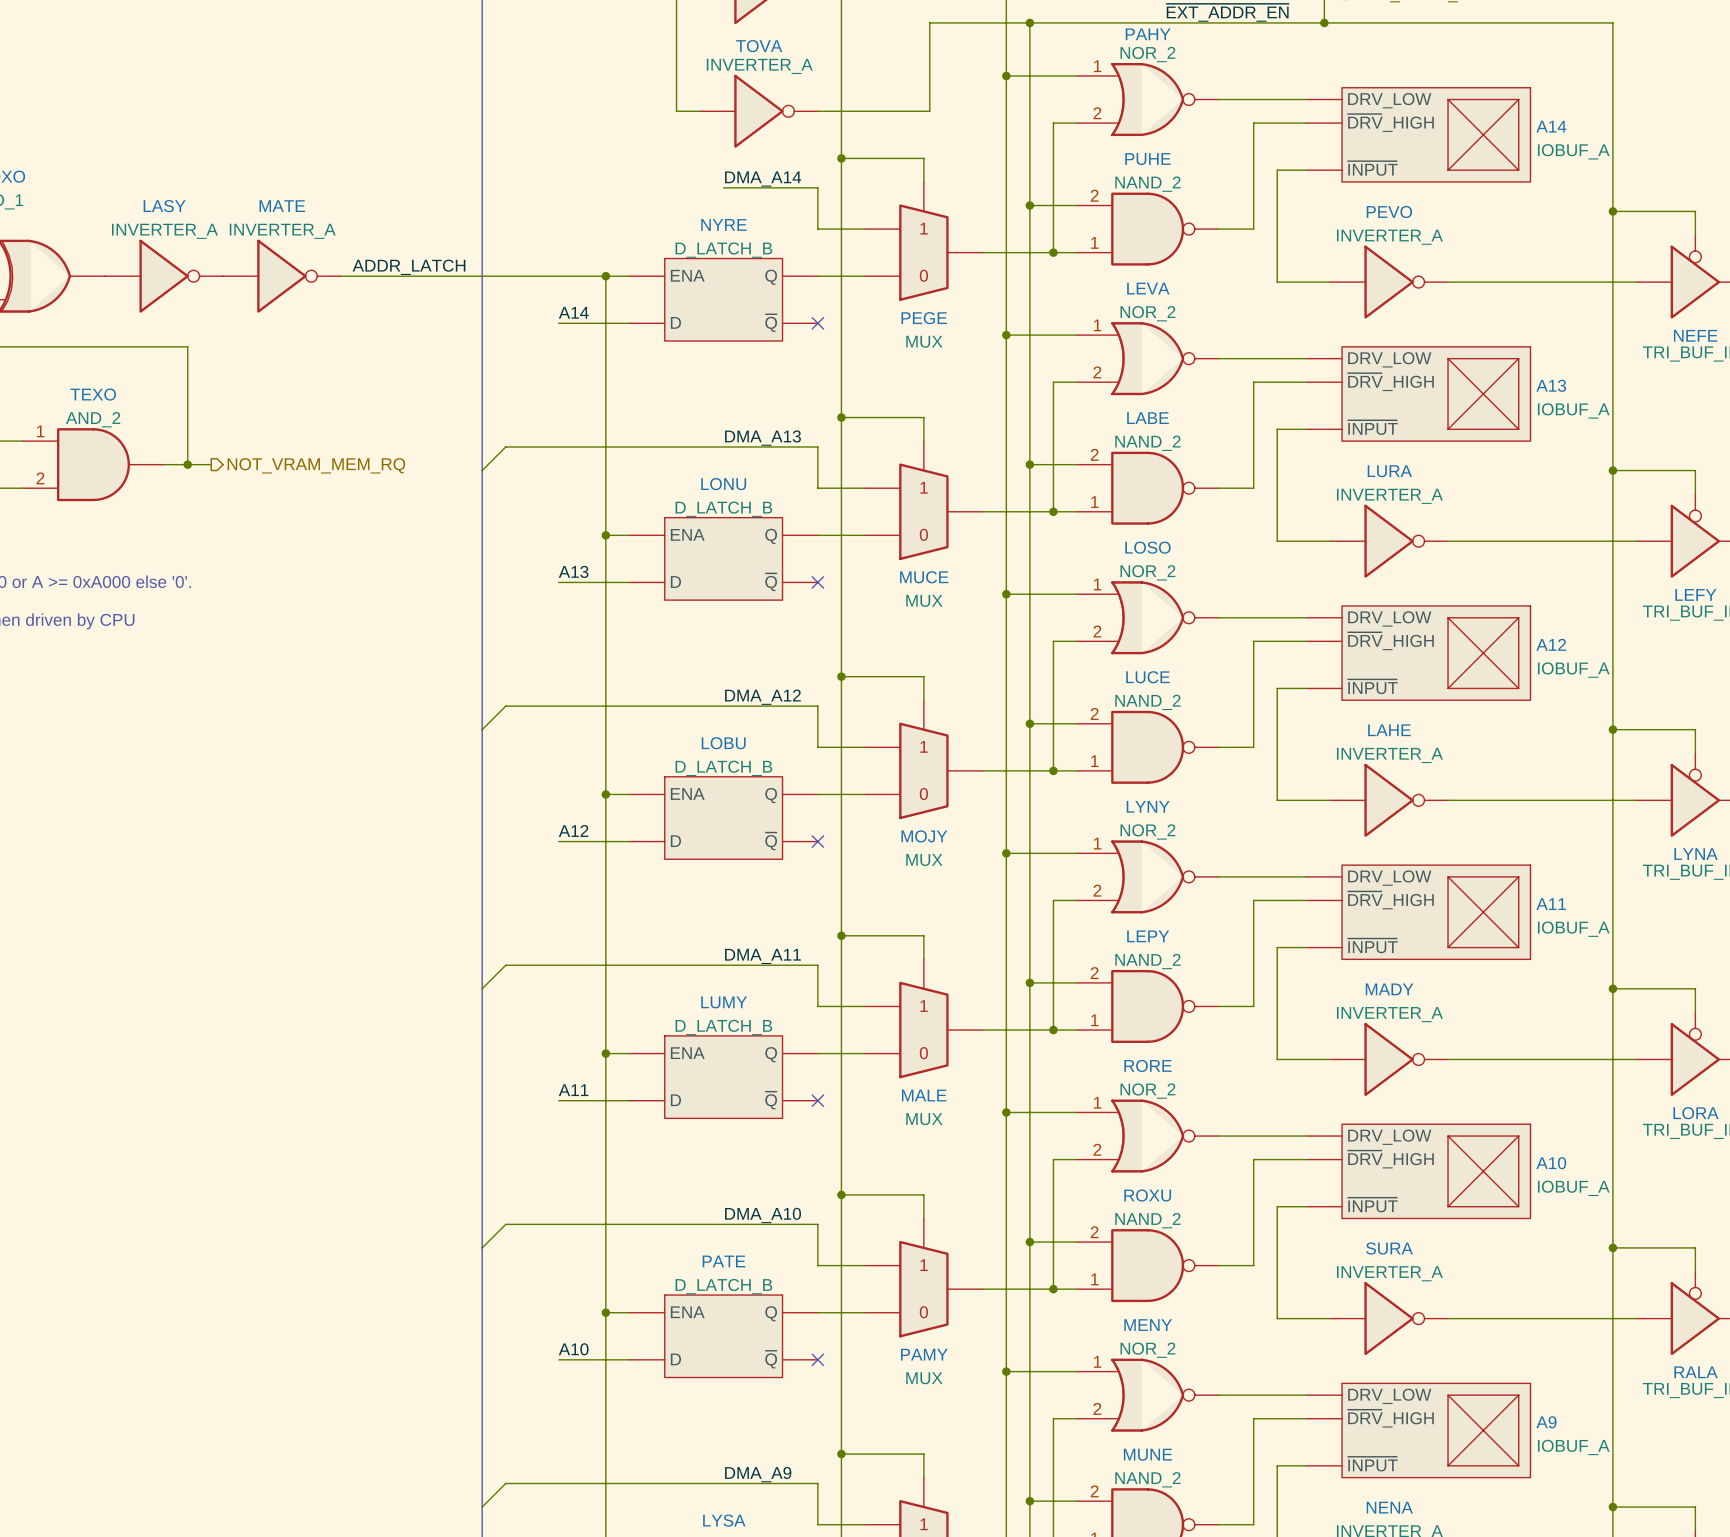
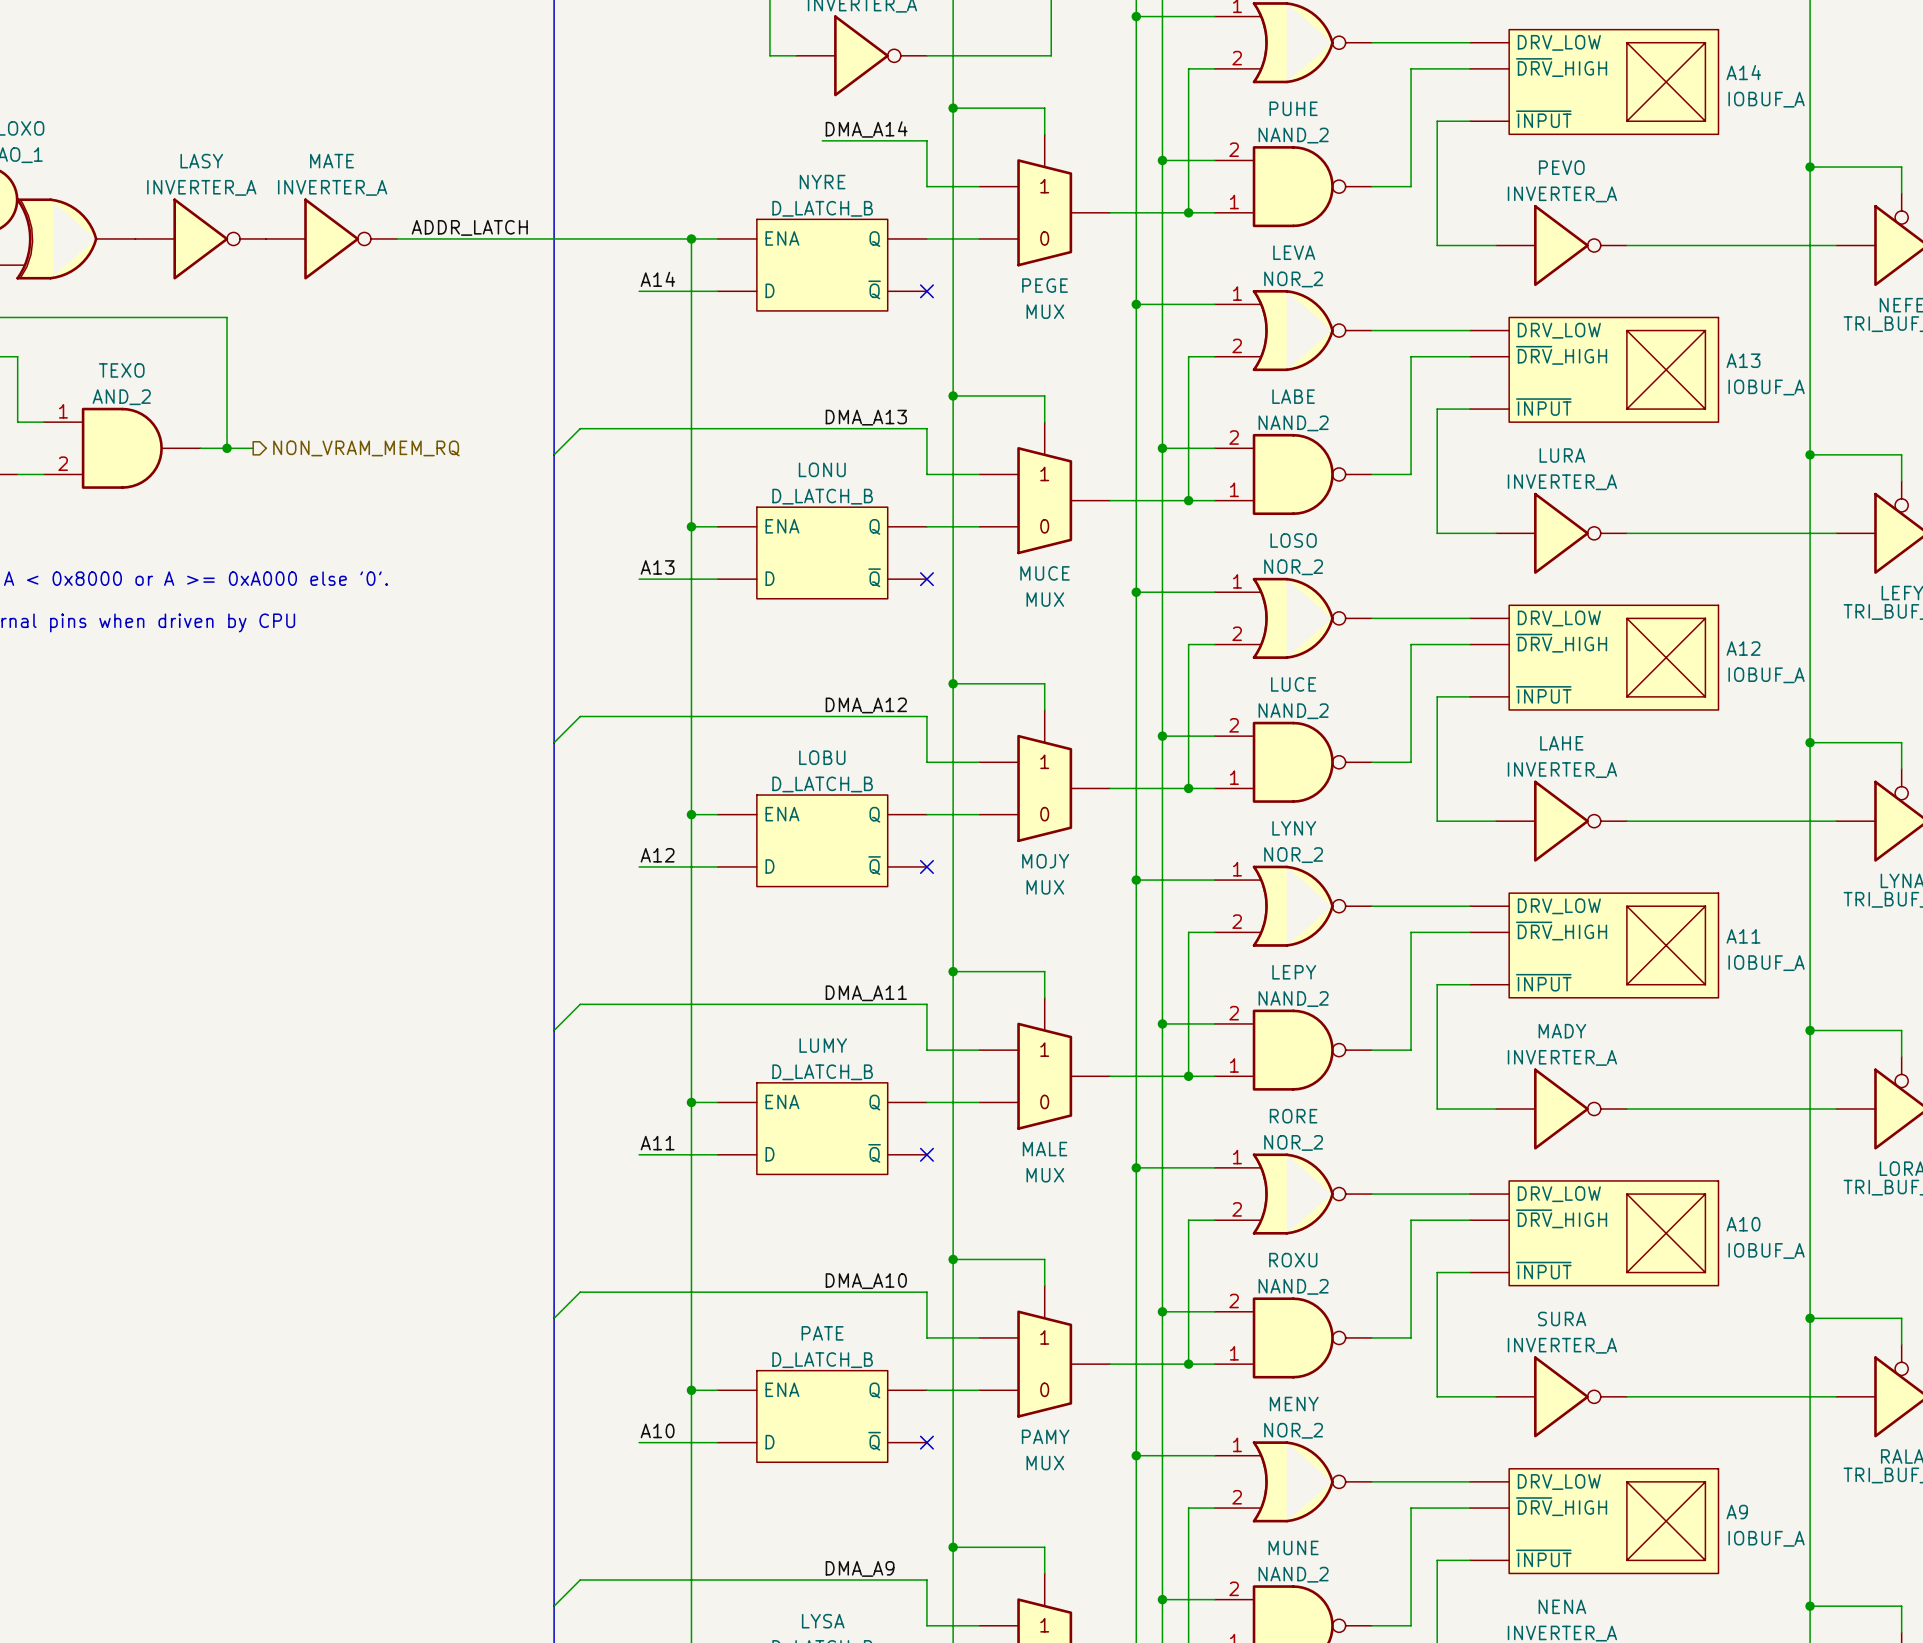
hierarchical label: NOT_VRAM_MEM_RQ (316, 465) -> NON_VRAM_MEM_RQ (366, 448)

